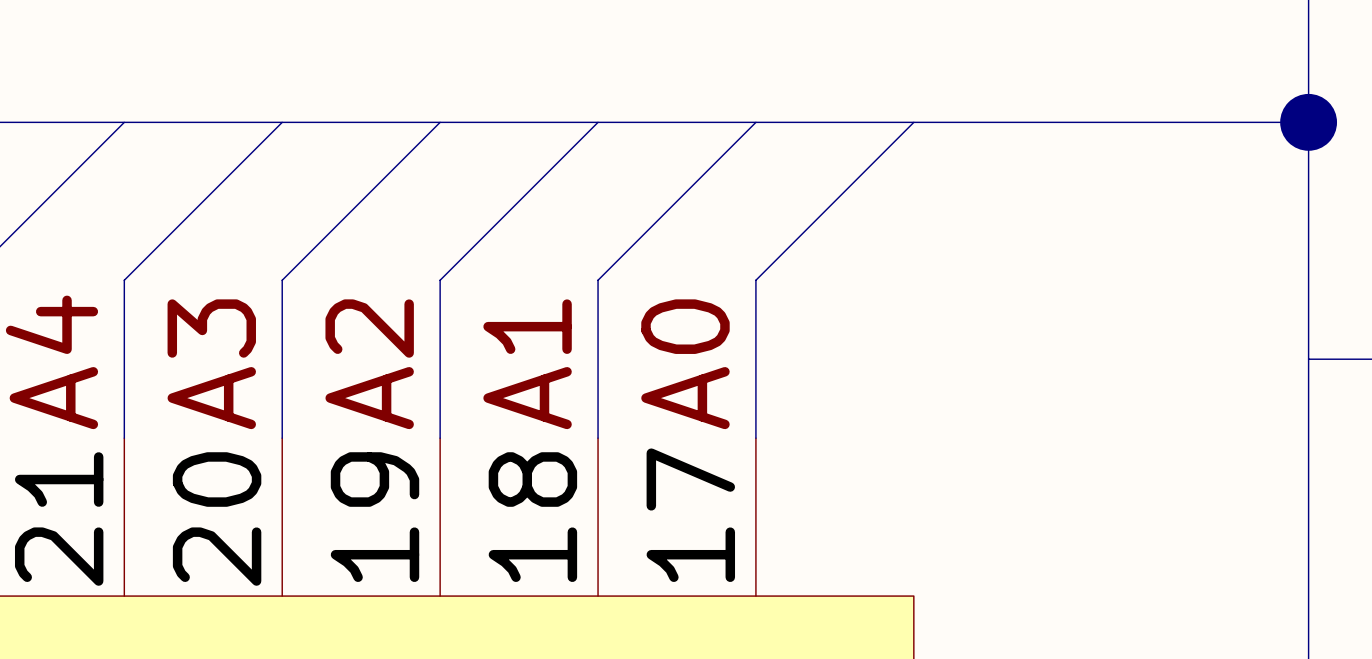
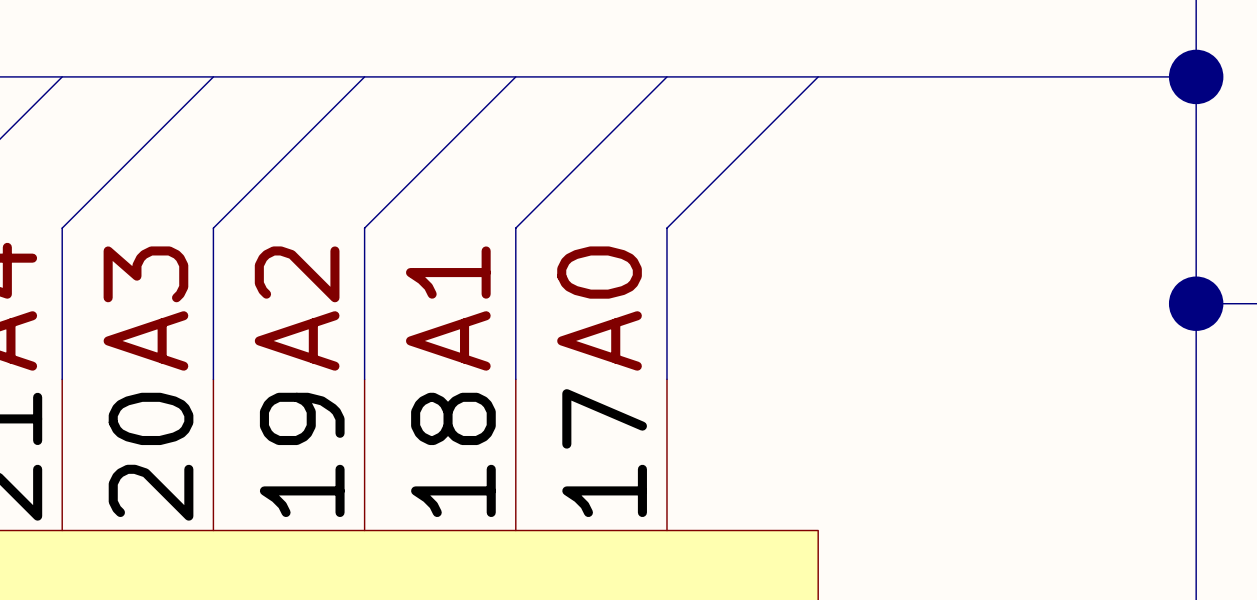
junction: none -> (1196, 303)

